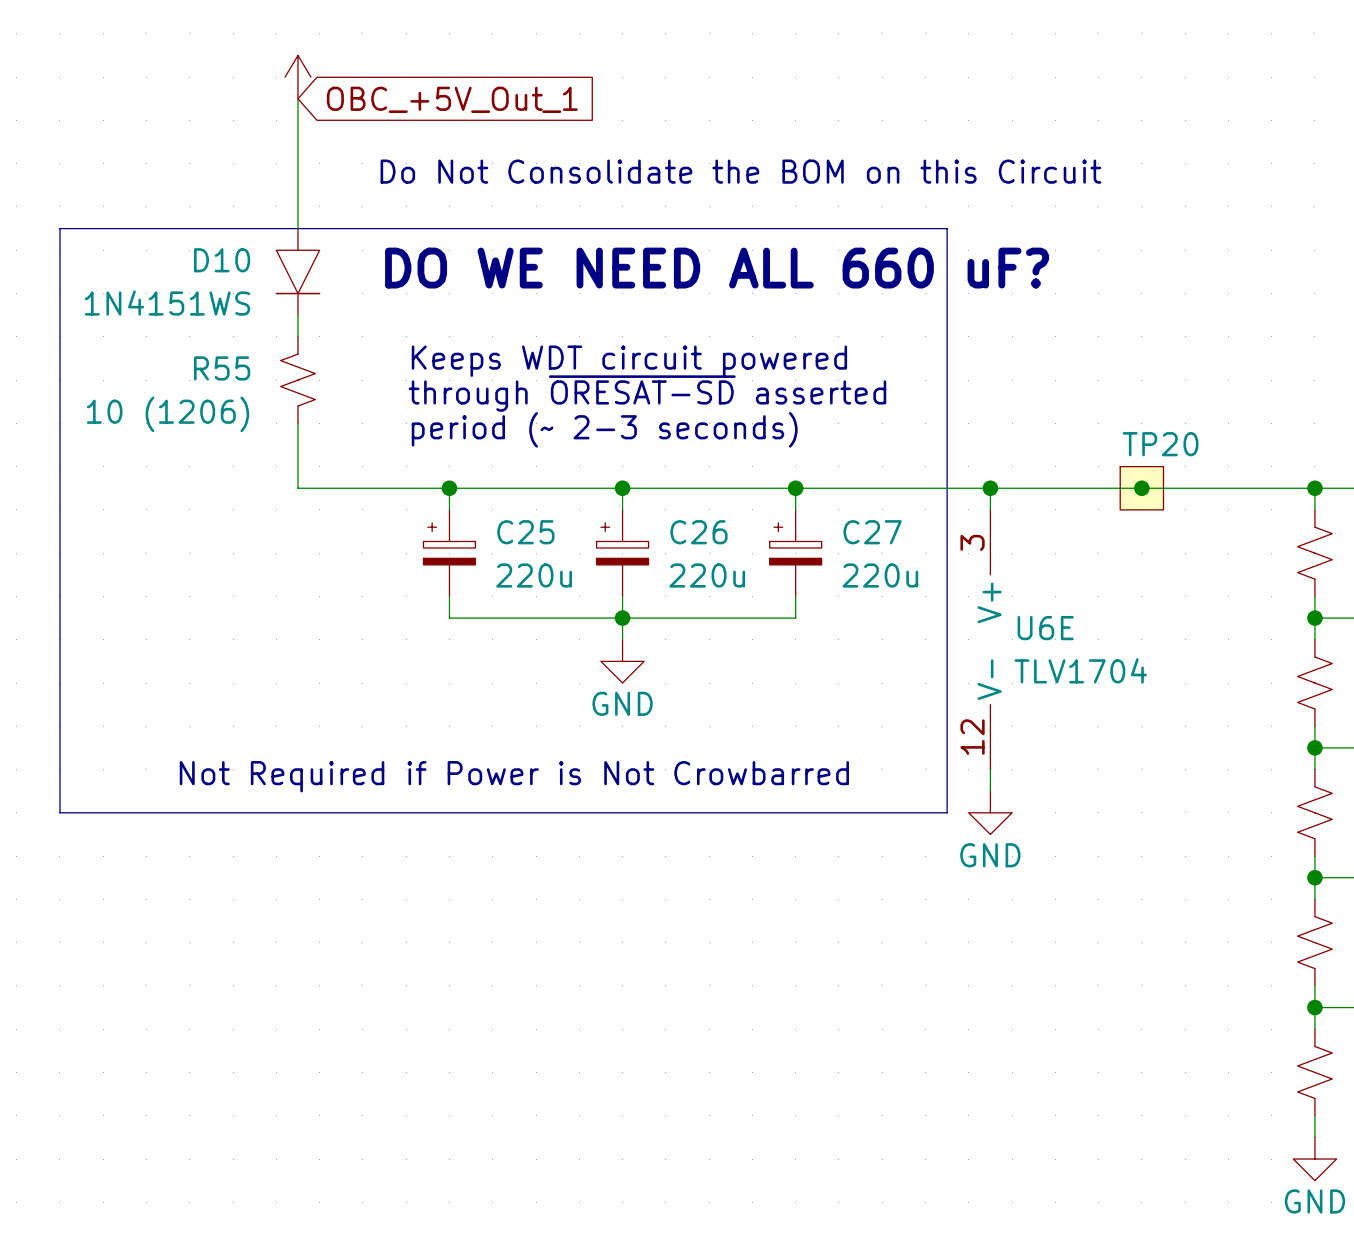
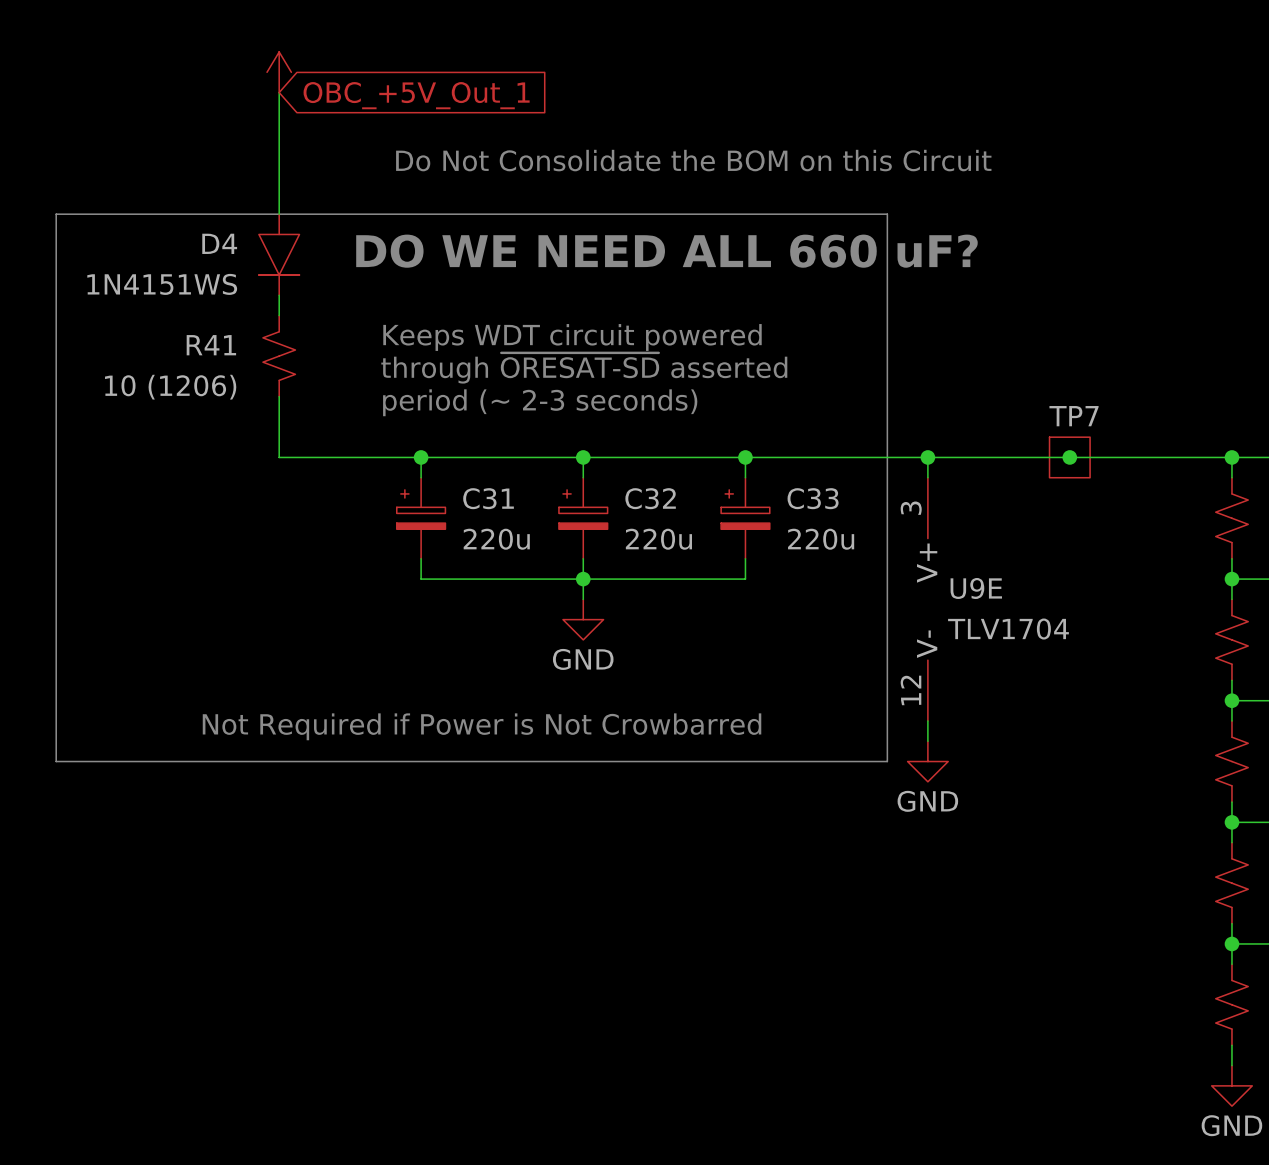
D10 name: D10 (222, 260) -> D4 (219, 243)
R55 name: R55 (222, 368) -> R41 (211, 345)
TP20 name: TP20 (1160, 444) -> TP7 (1074, 416)
C25 name: C25 (525, 532) -> C31 (488, 498)
C26 name: C26 (698, 532) -> C32 (650, 498)
C27 name: C27 (872, 532) -> C33 (813, 498)
U6E name: U6E (1045, 628) -> U9E (976, 588)

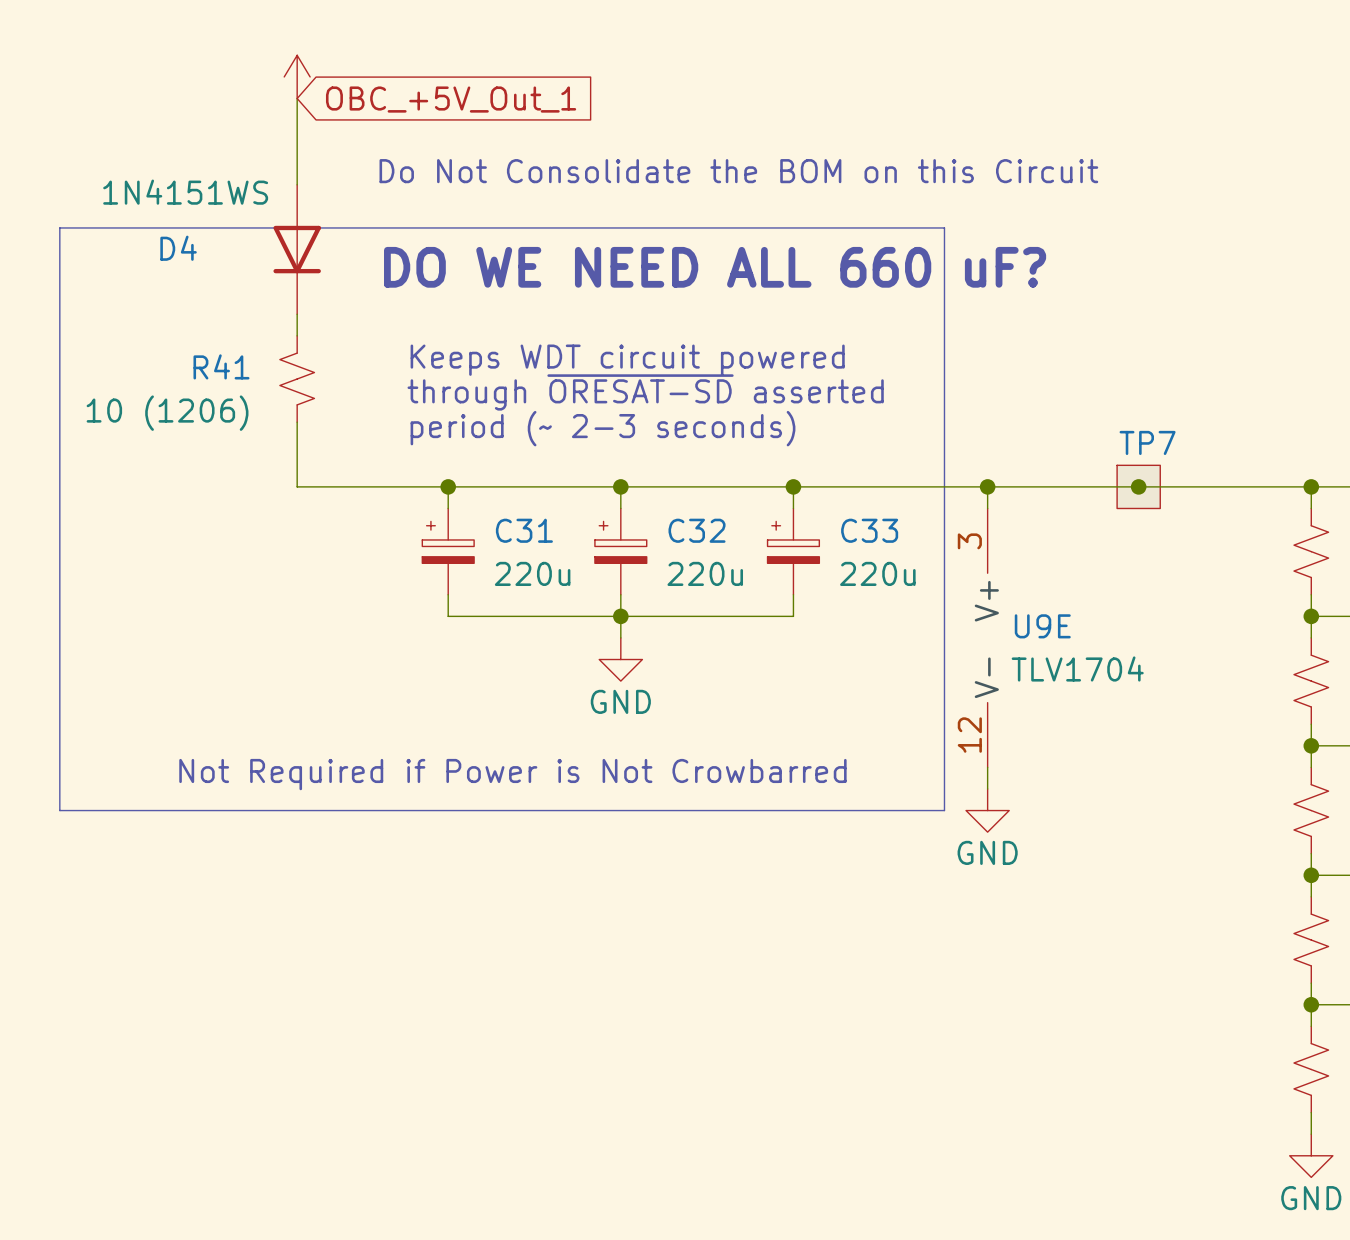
D4 symbol: [258, 214, 300, 296] -> [273, 184, 321, 315]
D4 name position: D4 (219, 243) -> D4 (178, 248)
D4 value position: 1N4151WS (162, 284) -> 1N4151WS (185, 192)

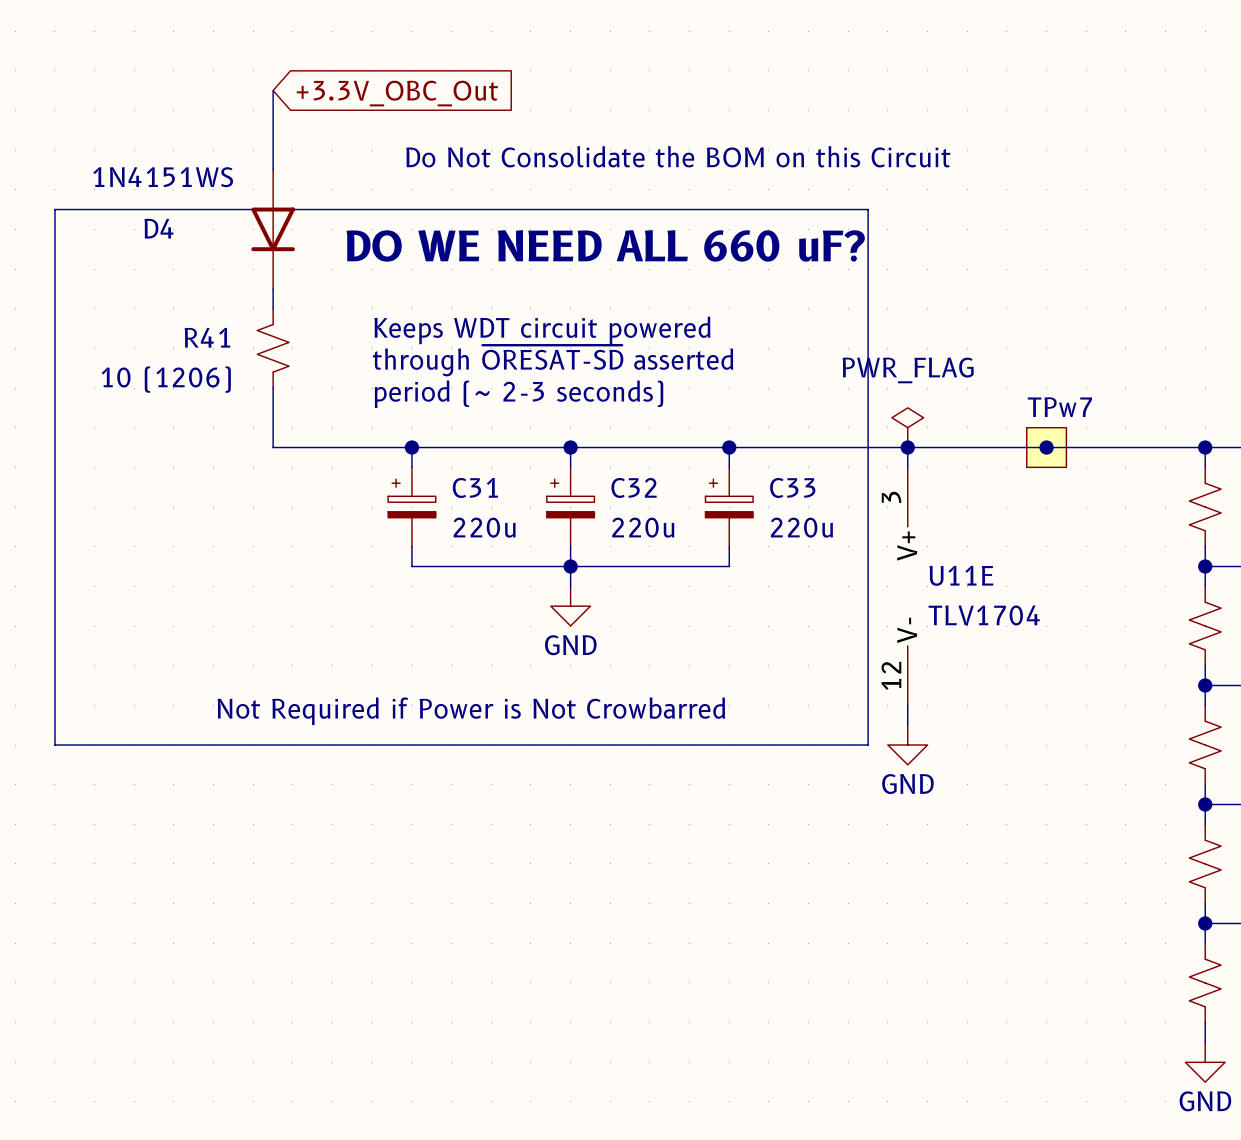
power symbol: (297, 76) -> none
global label: OBC_+5V_Out_1 (451, 99) -> +3.3V_OBC_Out (397, 93)
TP7 name: TP7 (1147, 442) -> TPw7 (1059, 407)
power symbol: none -> PWR_FLAG (907, 427)
U9E name: U9E (1042, 626) -> U11E (961, 575)

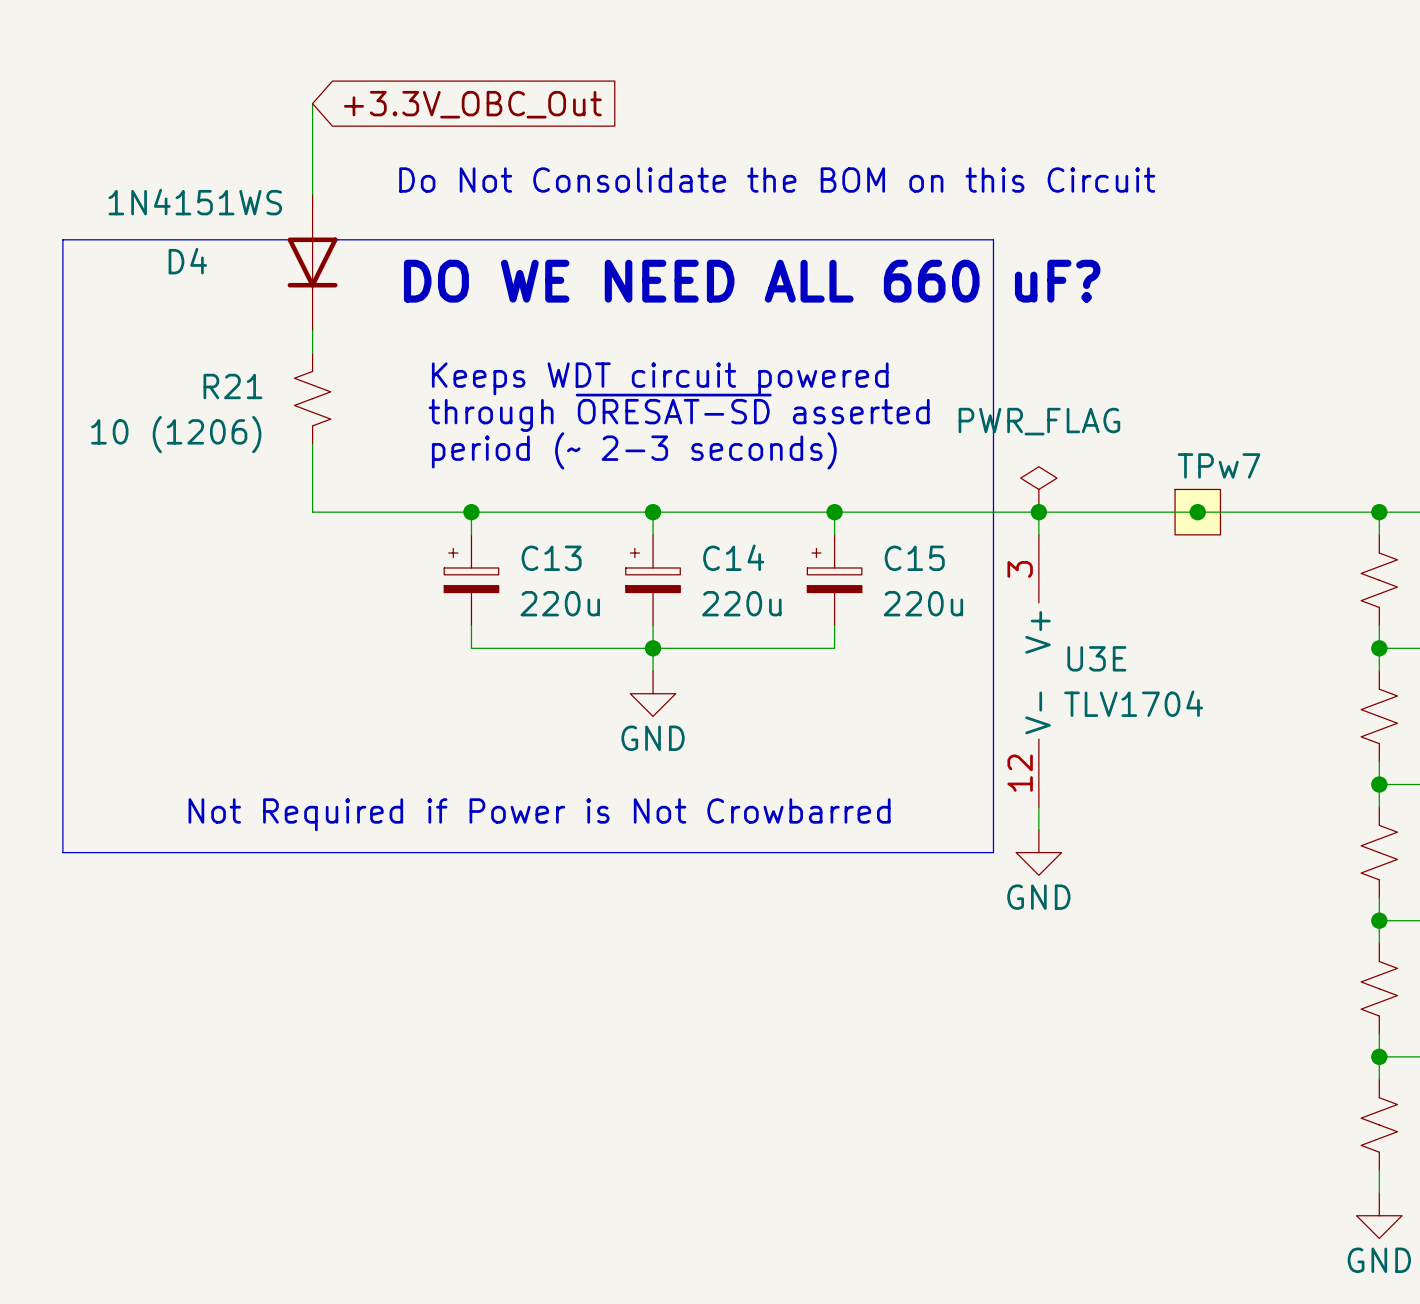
R41 name: R41 (207, 337) -> R21 (232, 386)
C31 name: C31 (475, 487) -> C13 (551, 558)
C32 name: C32 (634, 487) -> C14 (733, 557)
C33 name: C33 (792, 487) -> C15 (914, 558)
U11E name: U11E (961, 575) -> U3E (1096, 658)

